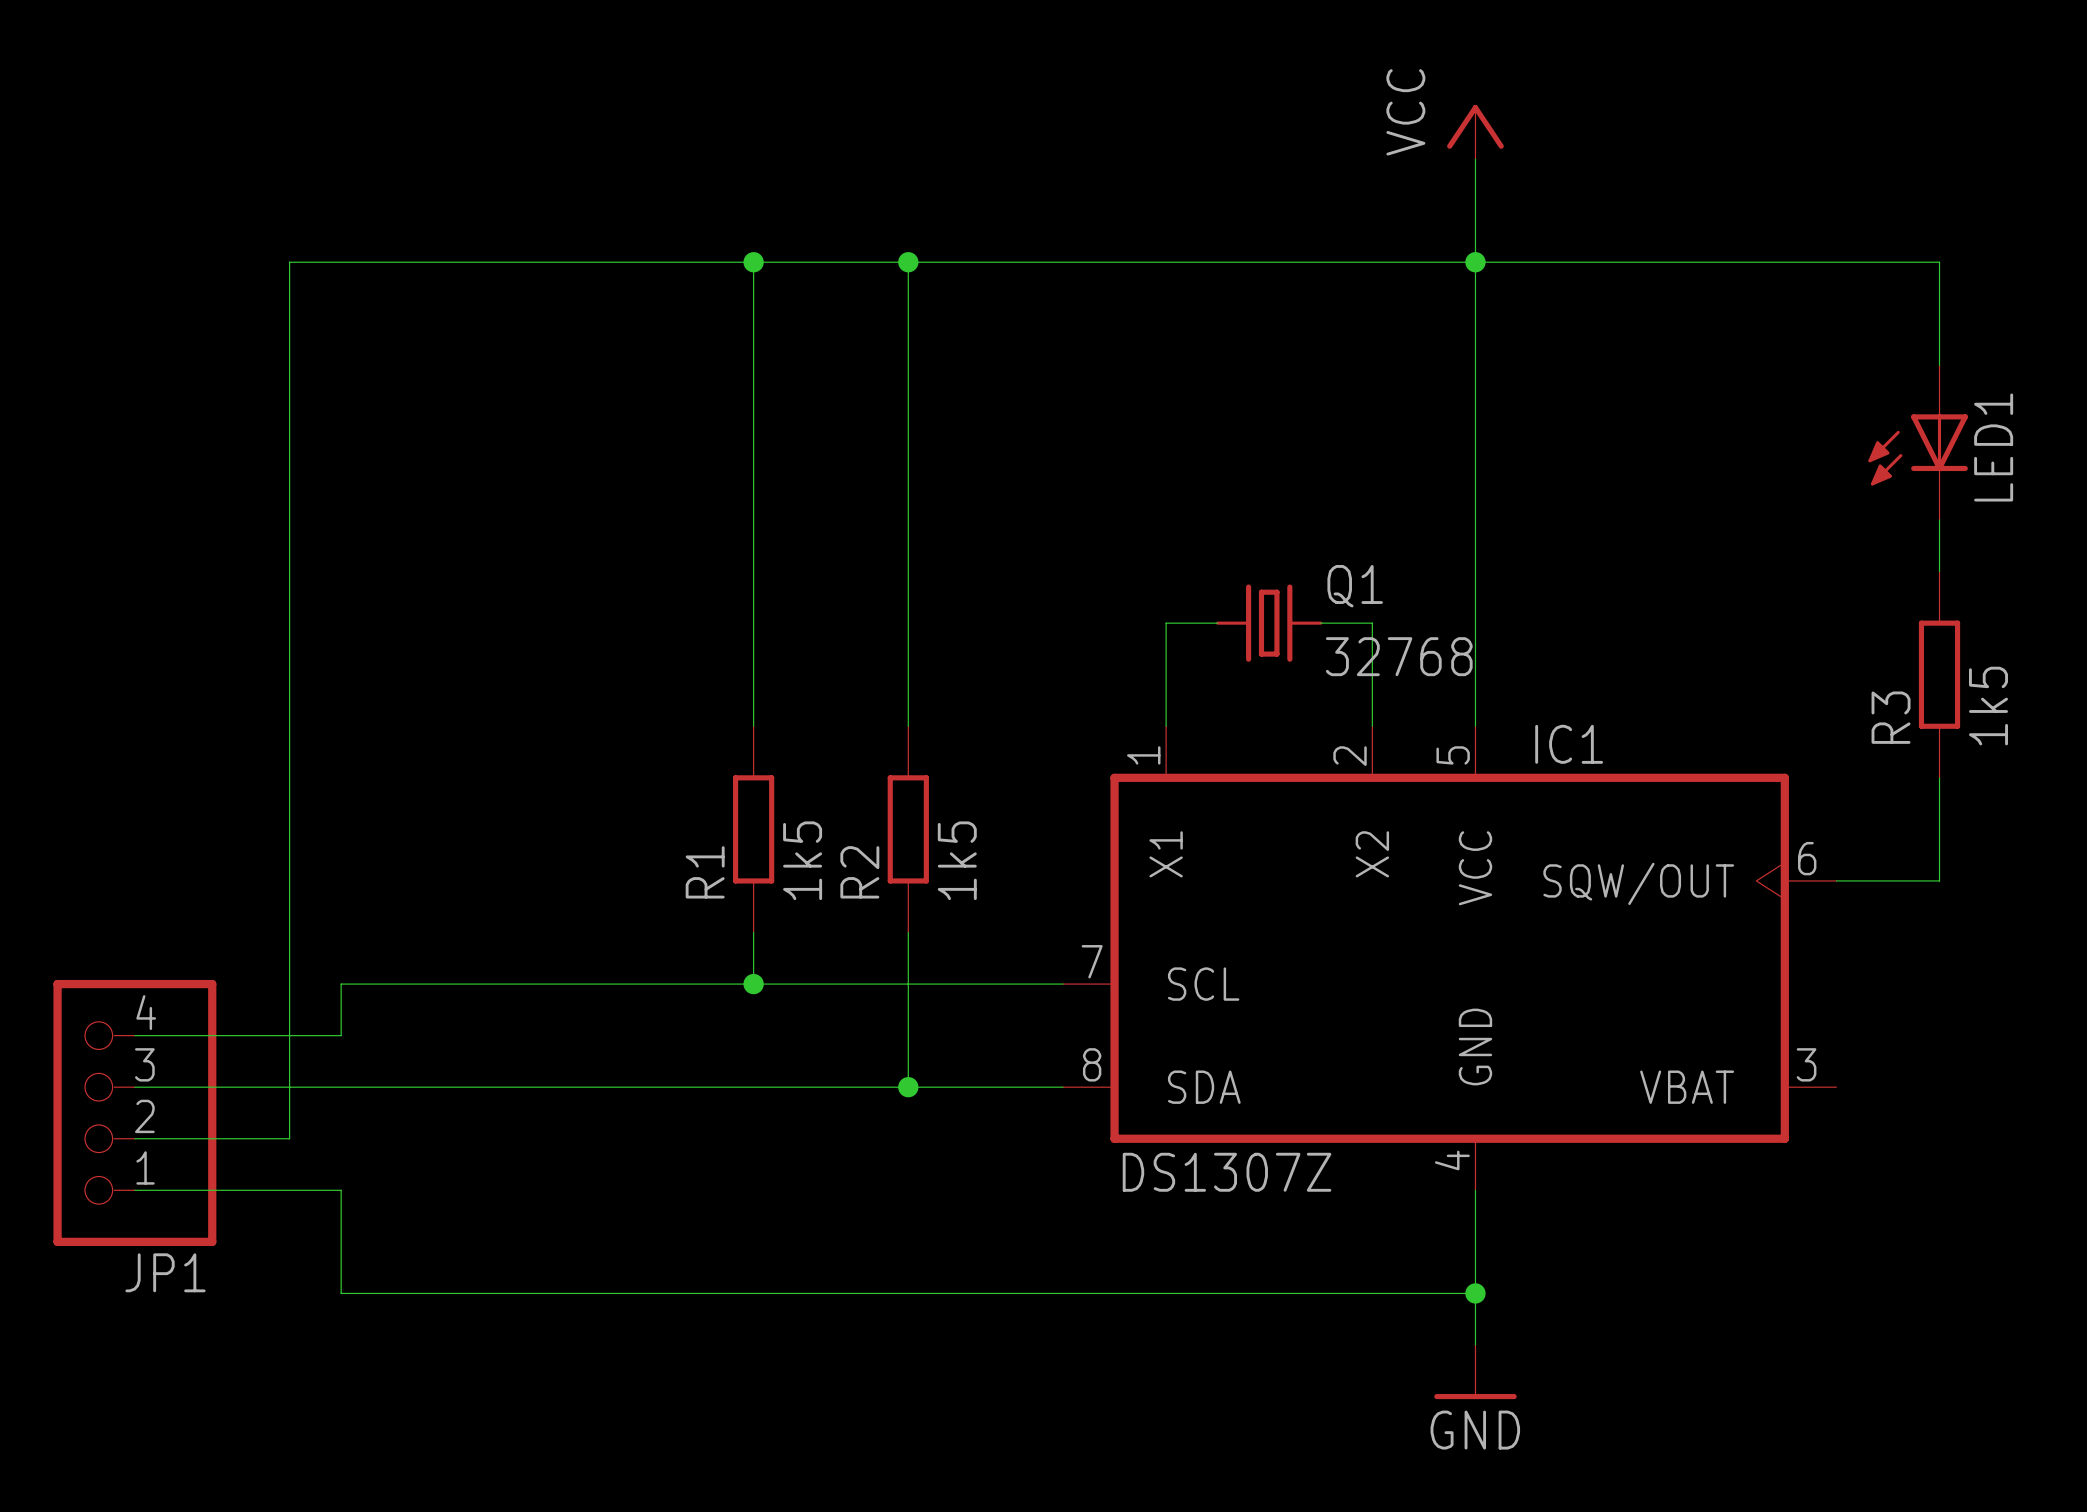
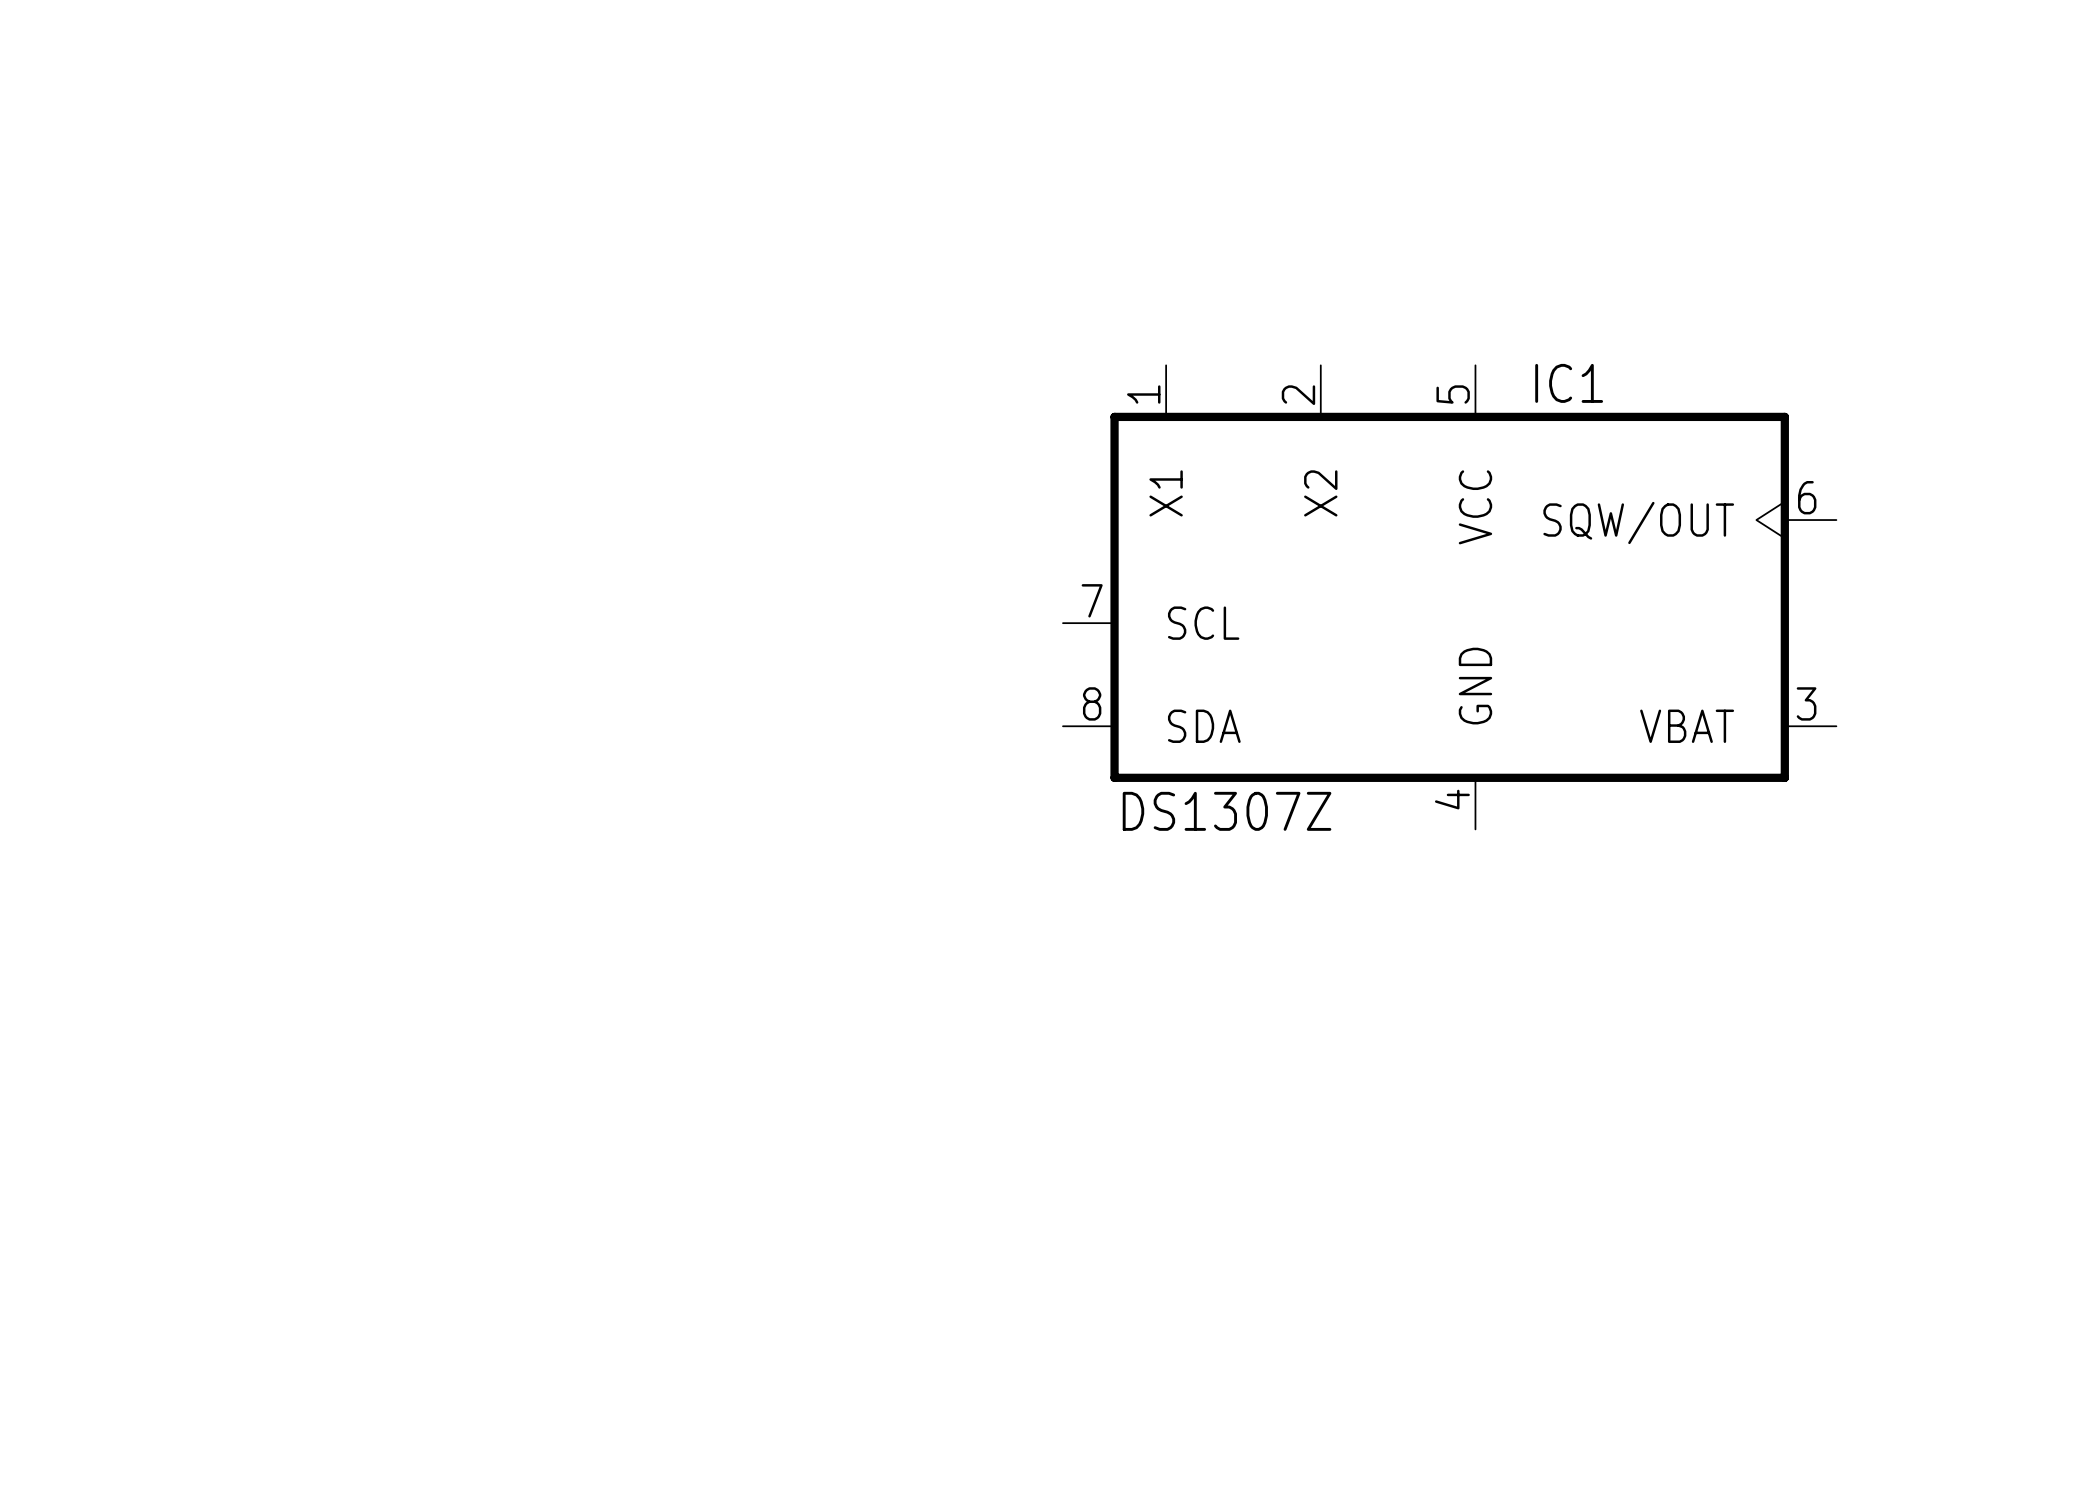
power symbol: VCC (1475, 132) -> none
wire: (1475, 159) (1475, 726) -> none
wire: (753, 262) (753, 726) -> none
junction: (753, 262) -> none
wire: (908, 262) (908, 726) -> none
junction: (908, 262) -> none
junction: (1475, 262) -> none
wire: (1939, 365) (1939, 262) (289, 262) (289, 1138) (134, 1138) -> none
LED1: (1918, 442) -> none
wire: (1939, 520) (1939, 571) -> none
wire: (1217, 623) (1166, 623) (1166, 726) -> none
Q1: 32768 (1269, 623) -> none
wire: (1320, 623) (1372, 623) (1372, 726) -> none
R3: 1k5 (1939, 674) -> none
IC1 symbol: [1062, 726, 1837, 1191] -> [1062, 365, 1837, 830]
wire: (1939, 777) (1939, 880) (1836, 880) -> none
R1: 1k5 (753, 829) -> none
R2: 1k5 (908, 829) -> none
wire: (753, 932) (753, 984) -> none
wire: (908, 932) (908, 1087) -> none
junction: (753, 984) -> none
wire: (1062, 984) (341, 984) (341, 1035) (134, 1035) -> none
wire: (134, 1087) (1062, 1087) -> none
junction: (908, 1087) -> none
JP1: (134, 1112) -> none
wire: (134, 1190) (341, 1190) (341, 1293) (1475, 1293) -> none
wire: (1475, 1190) (1475, 1344) -> none
junction: (1475, 1293) -> none
power symbol: GND (1475, 1372) -> none

